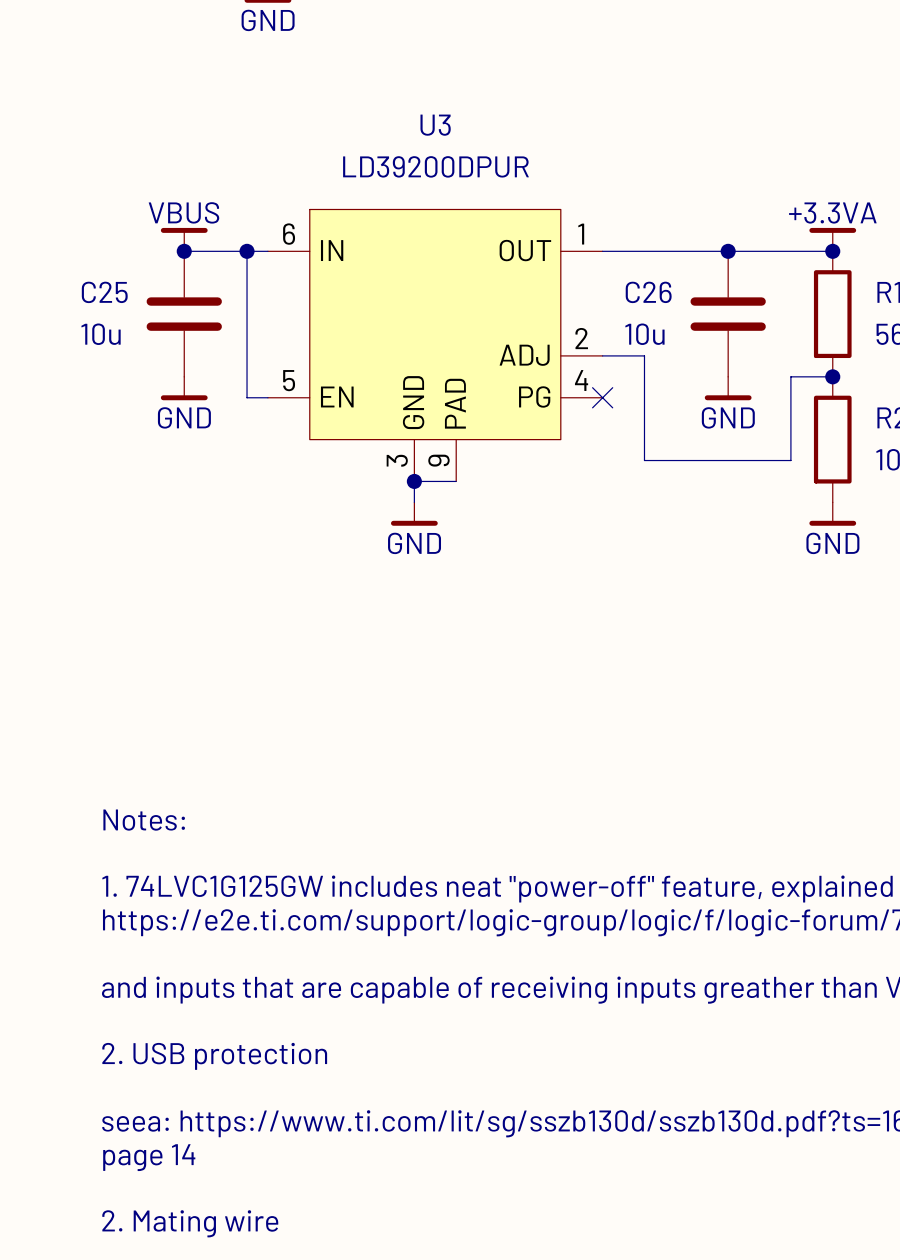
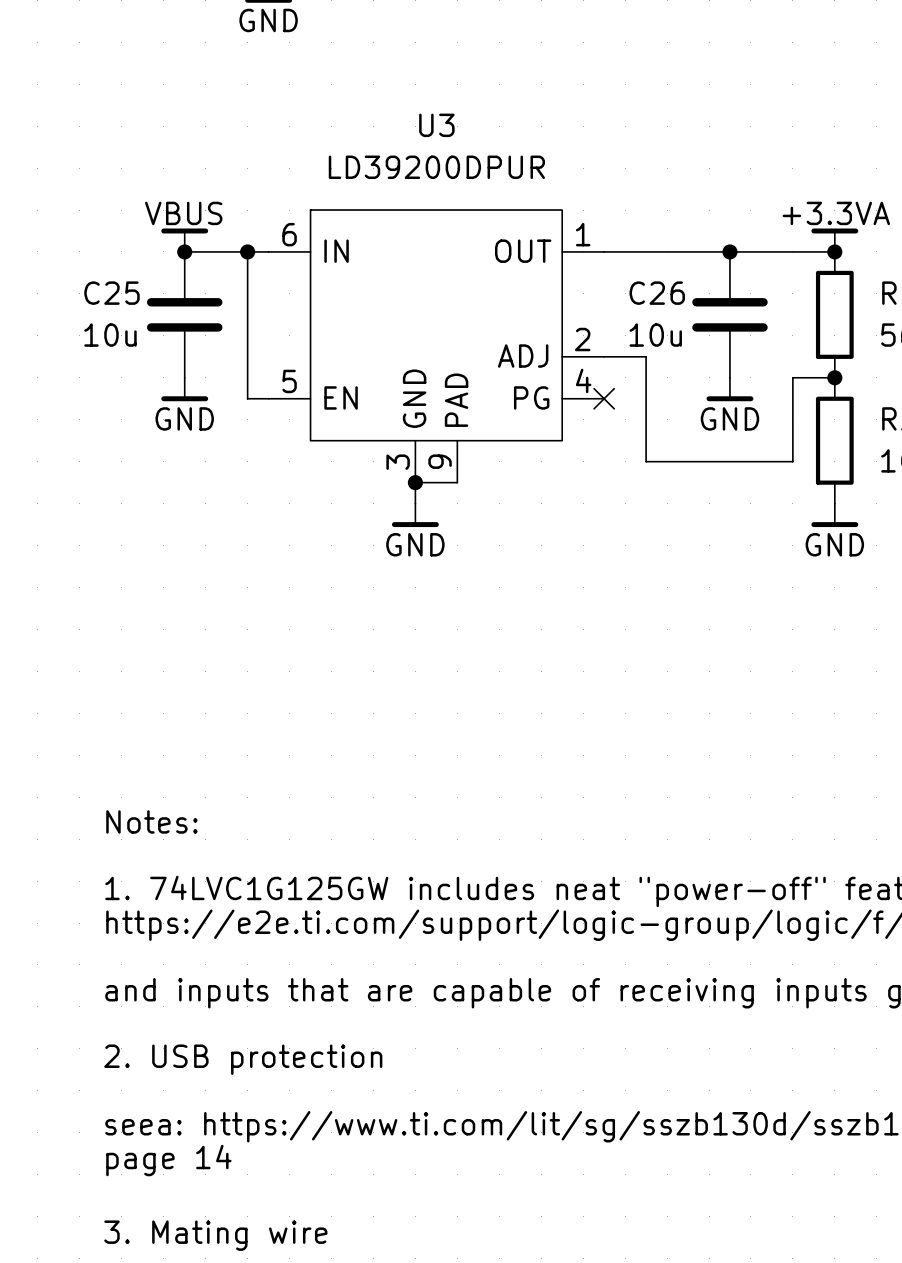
text: 2. Mating wire (190, 1223) -> 3. Mating wire (215, 1235)

